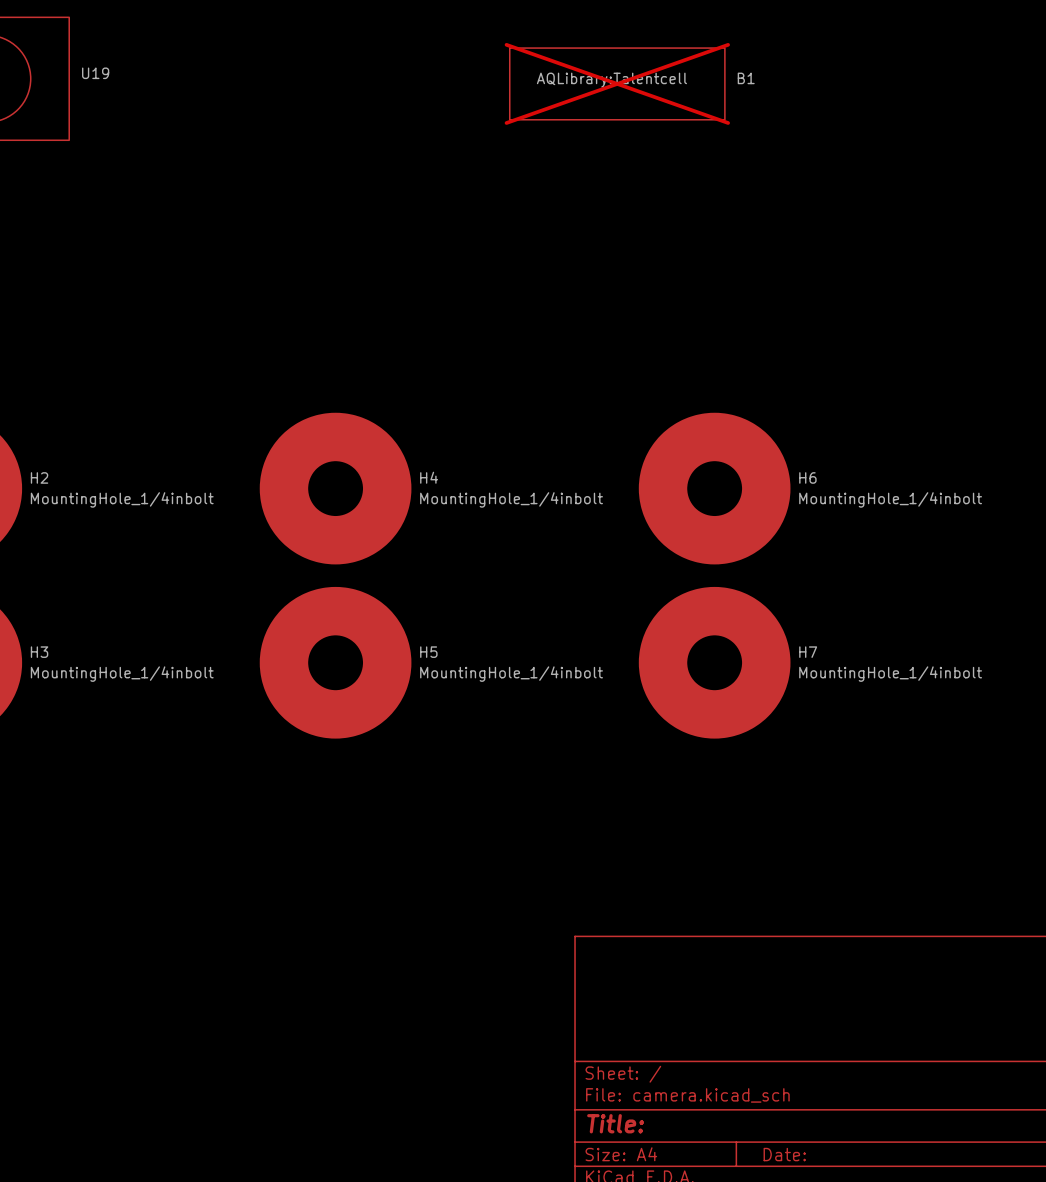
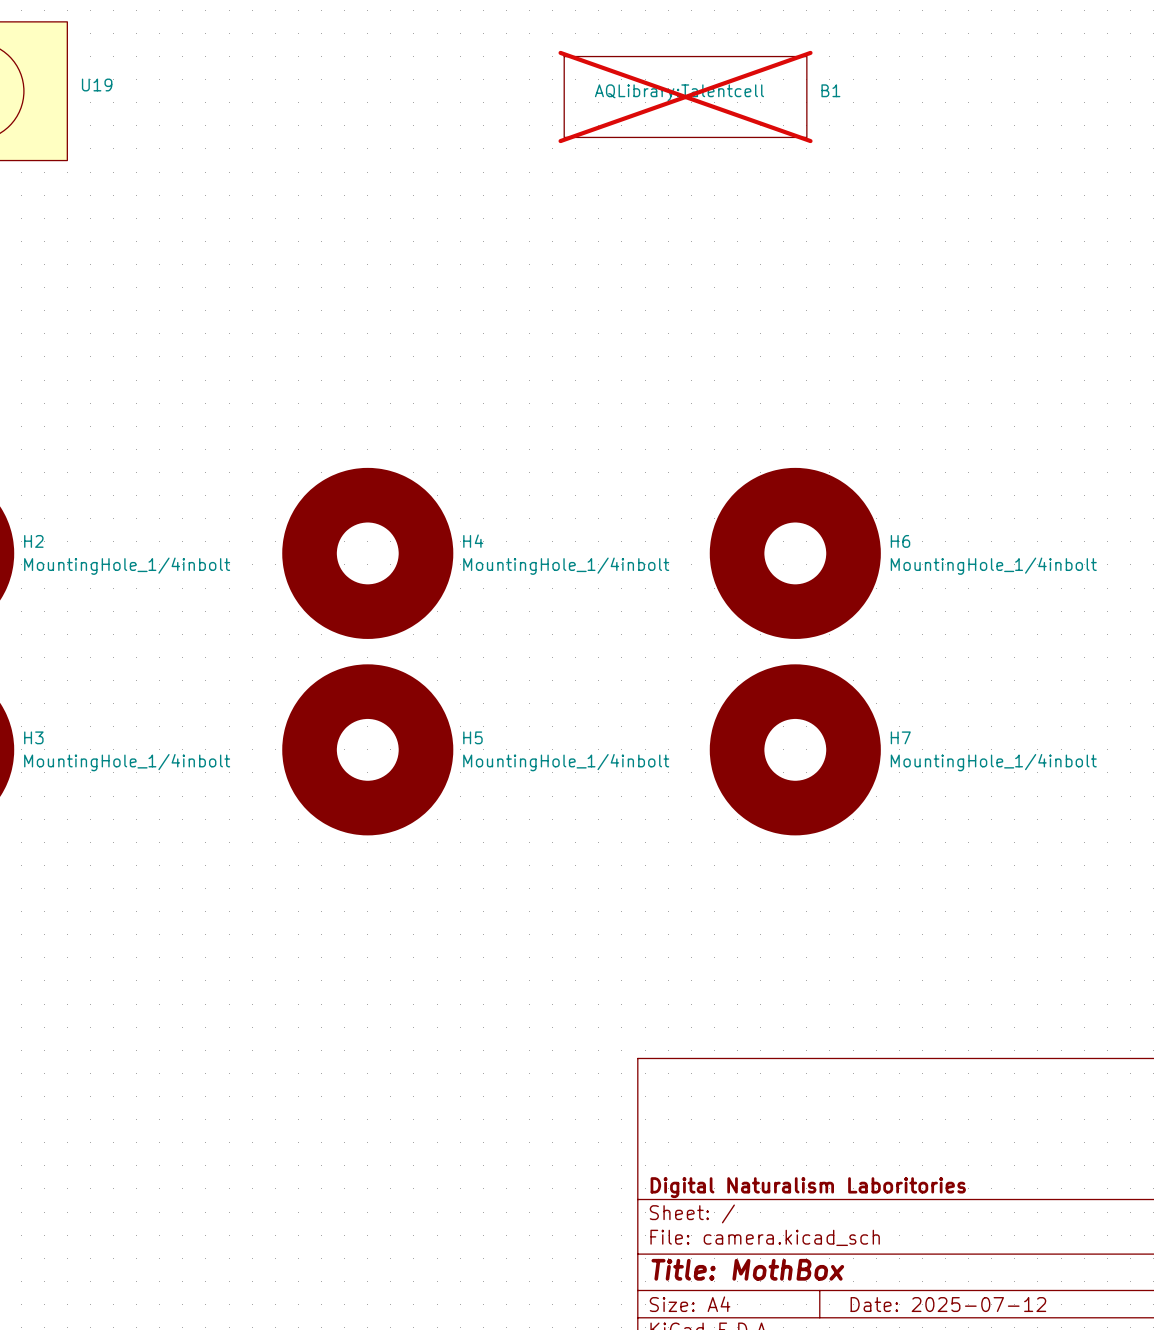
title block: none -> Digital Naturalism Laboritories (808, 1187)
title block: Title: (615, 1123) -> Title: MothBox (747, 1269)
title block: Date: (784, 1154) -> Date: 2025-07-12 (948, 1304)

